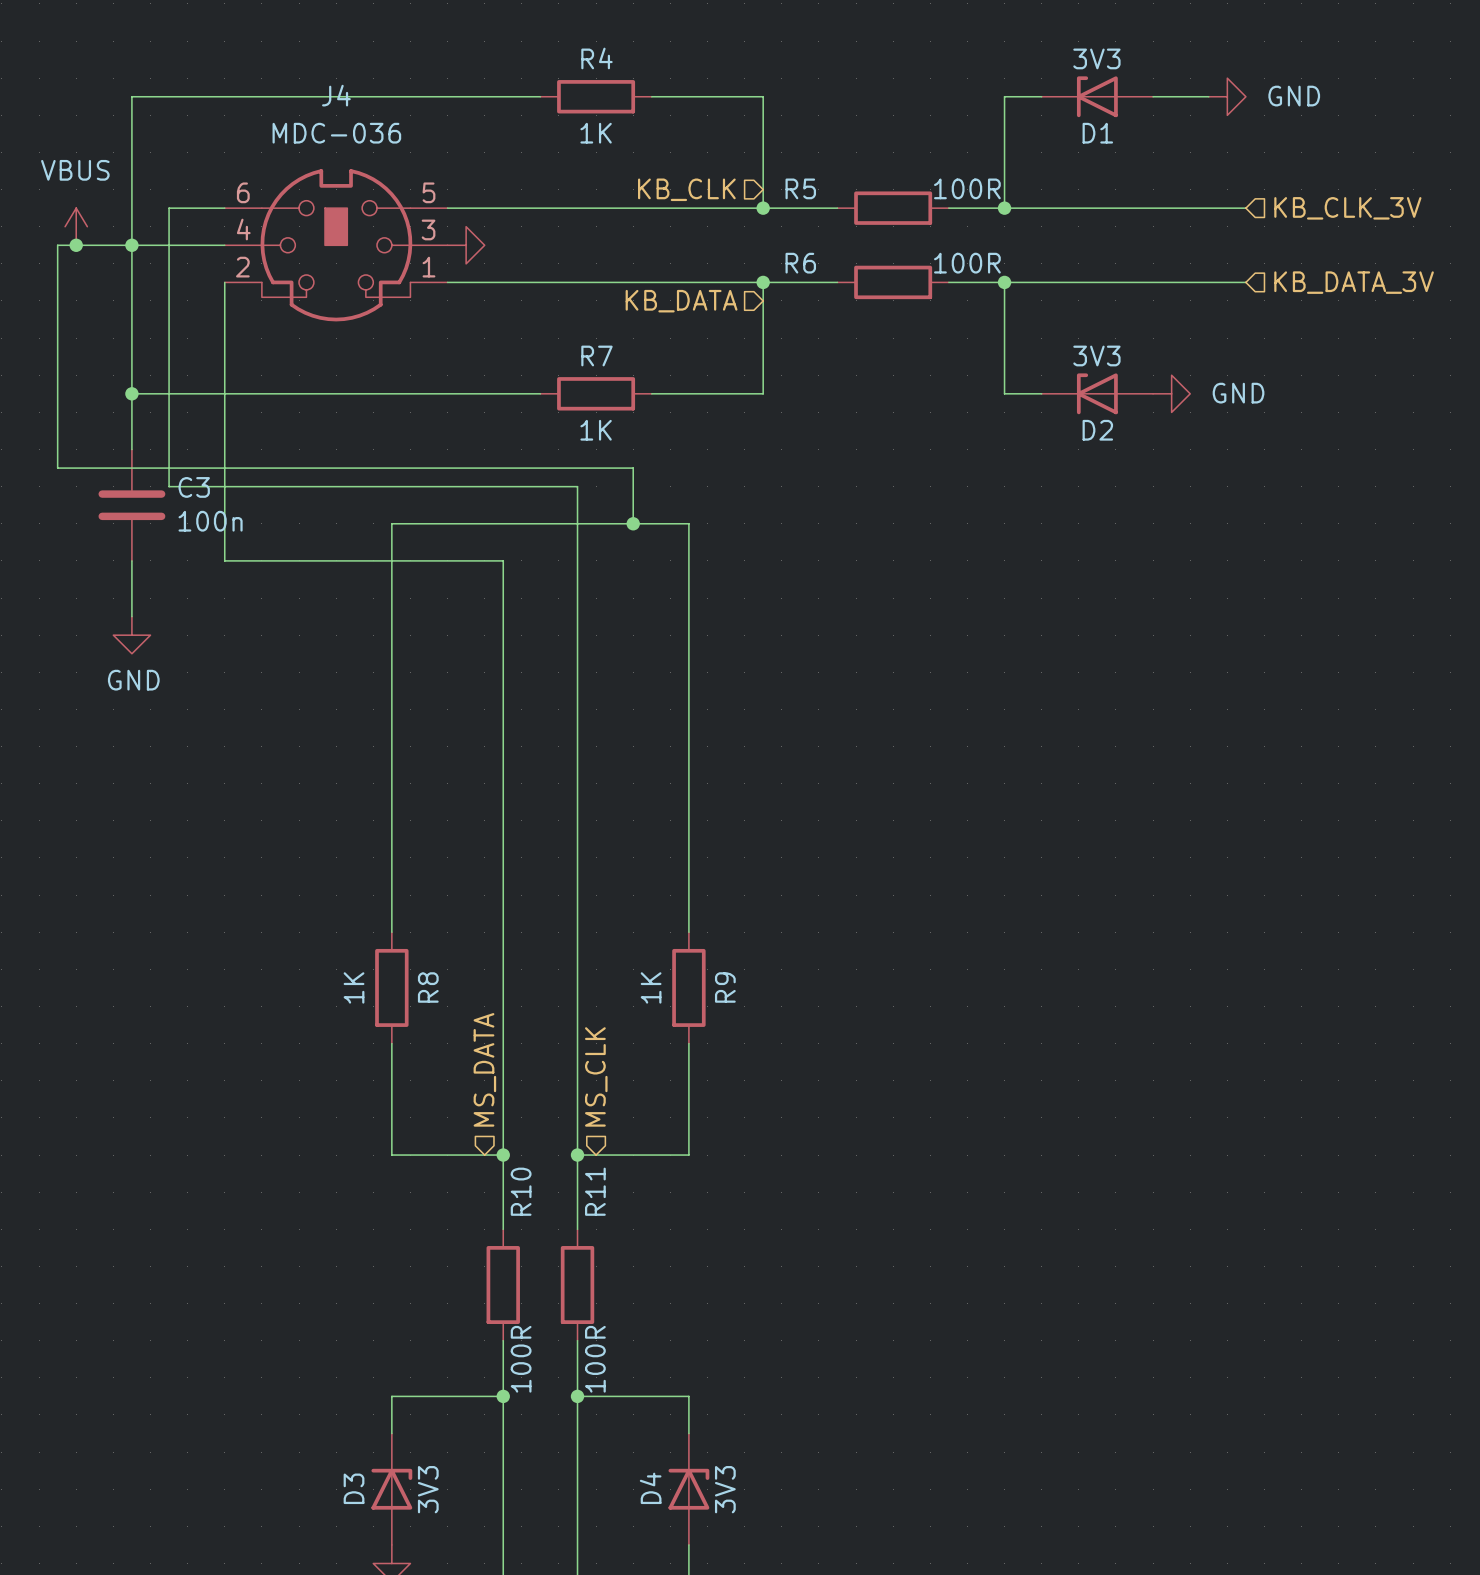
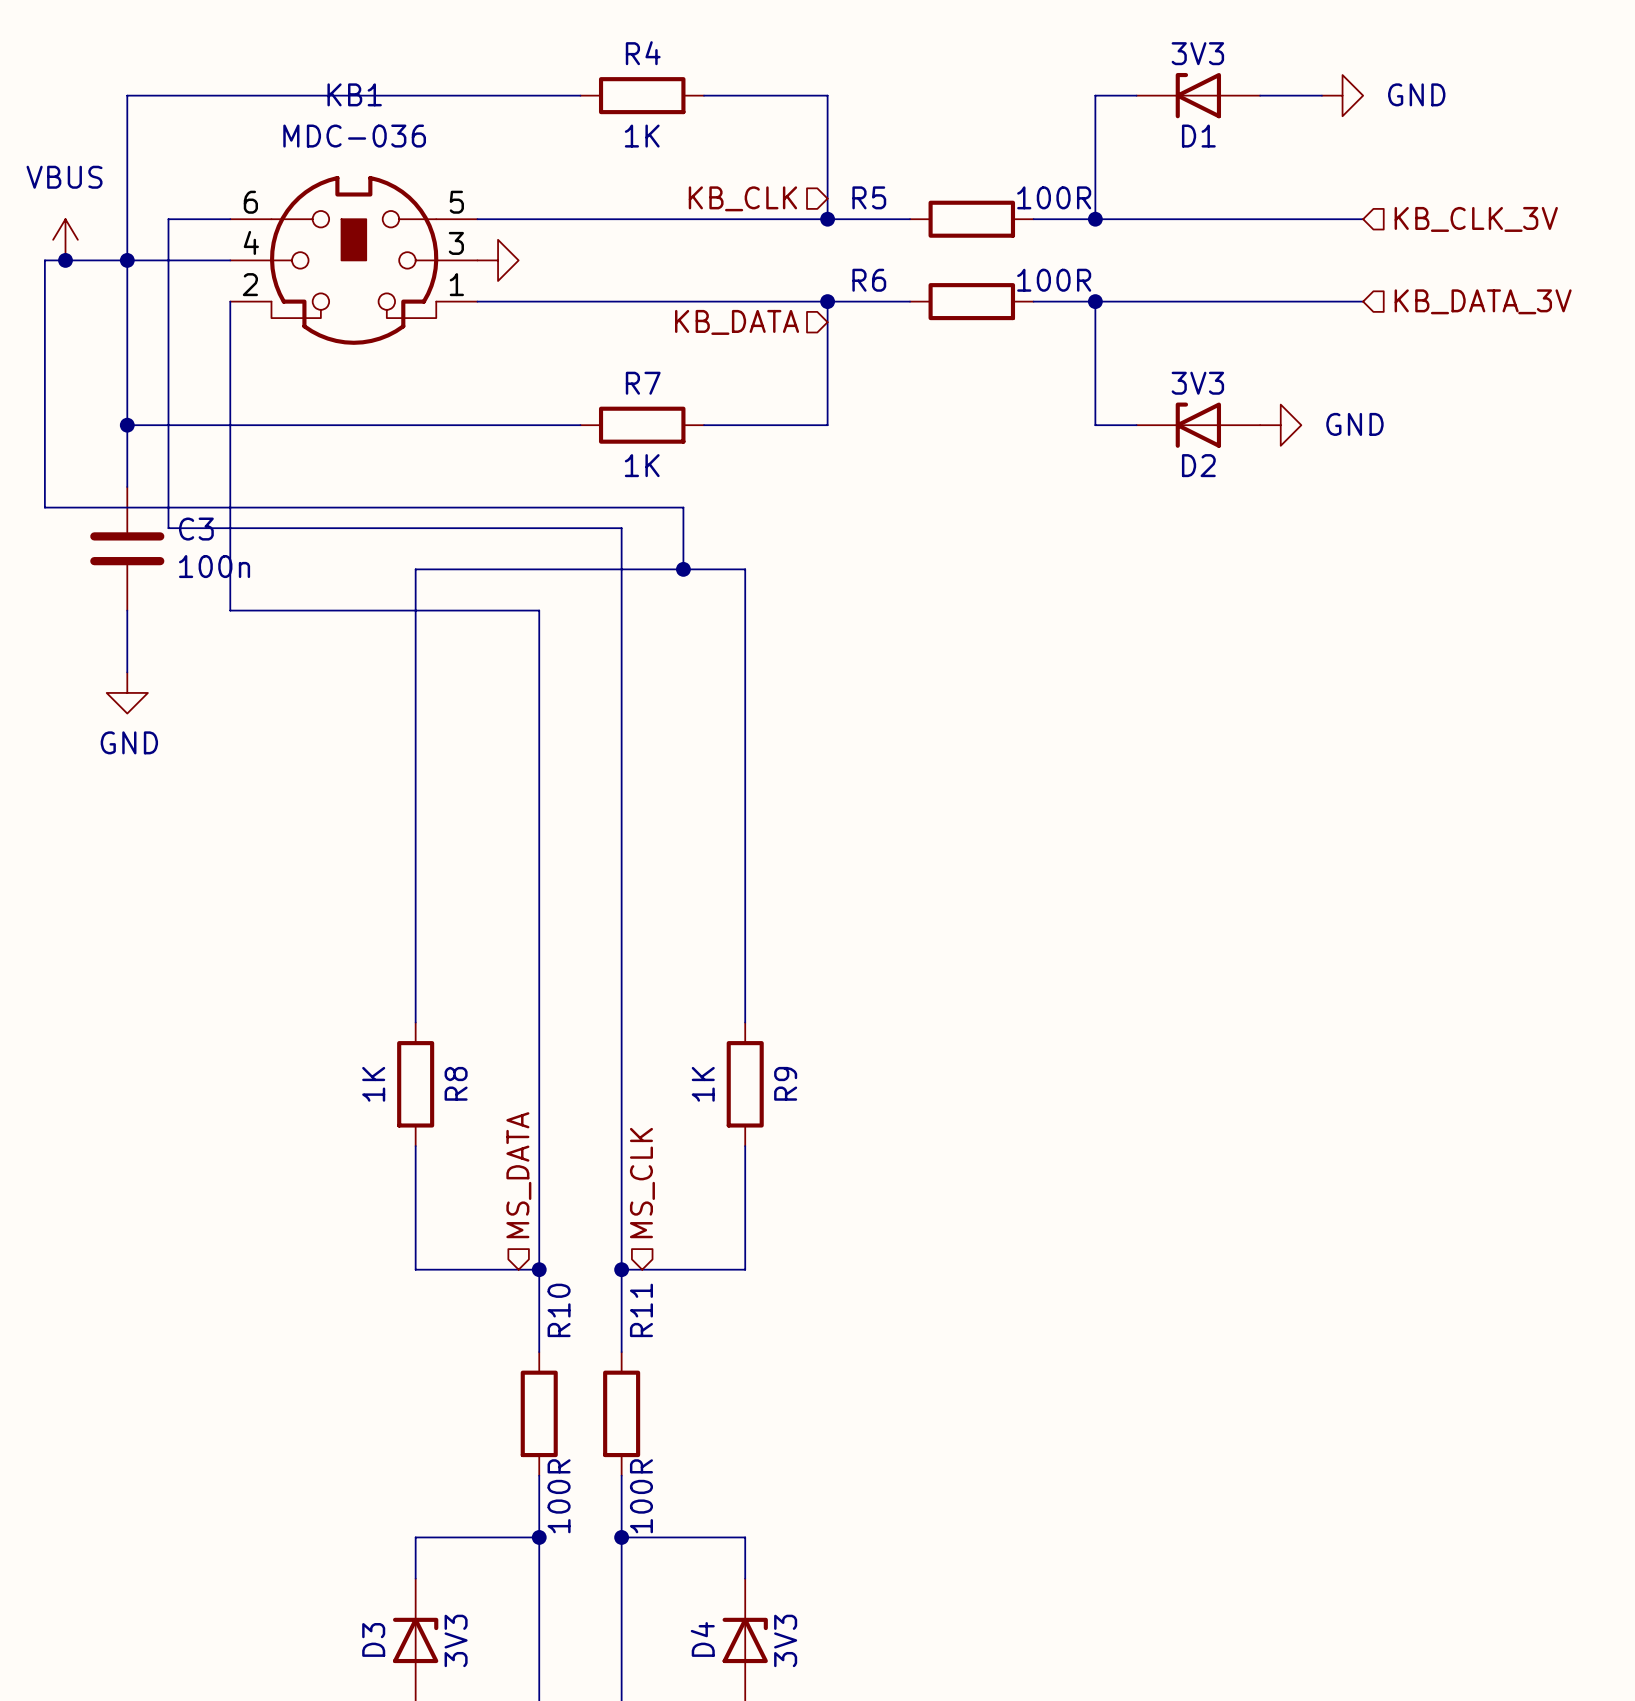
J4 name: J4 (336, 95) -> KB1 (354, 94)

